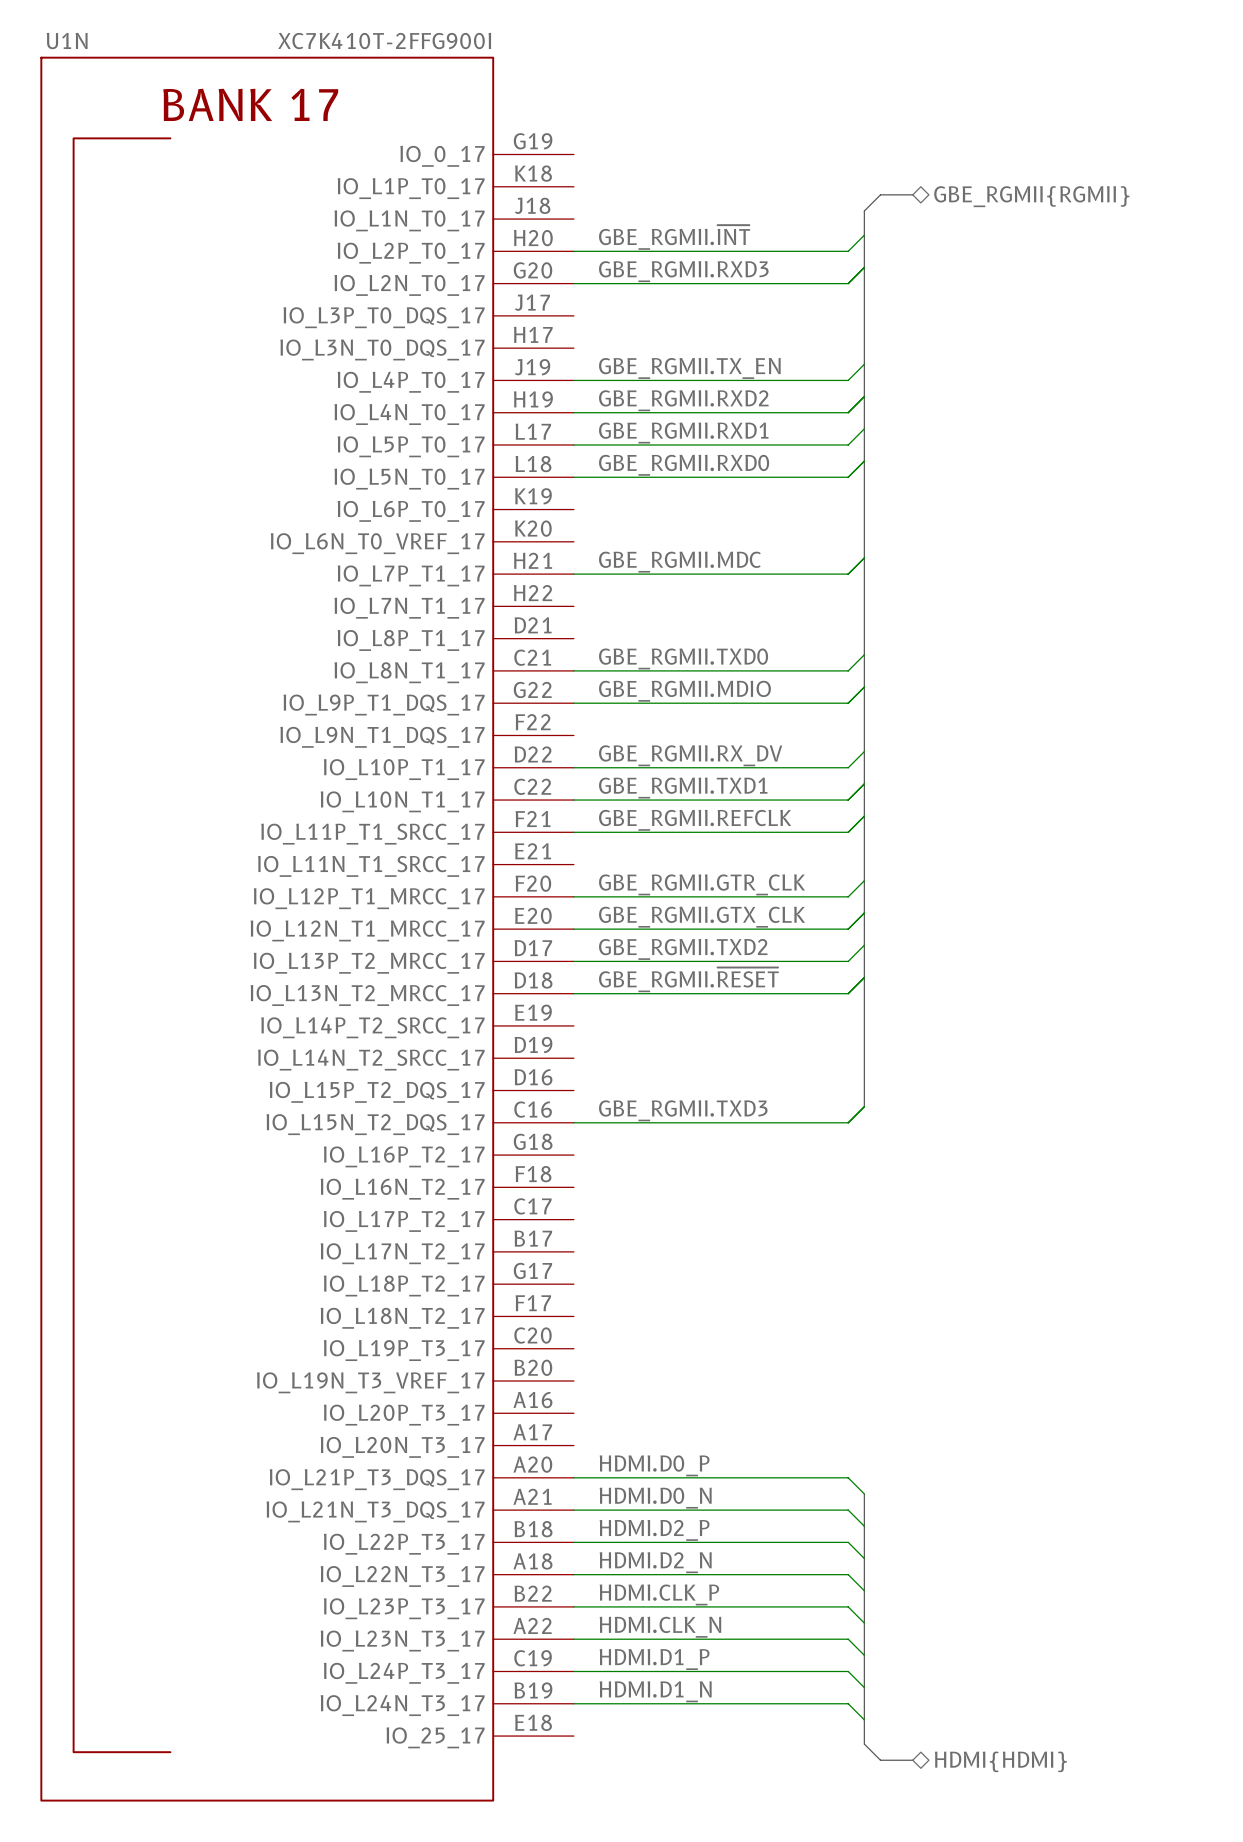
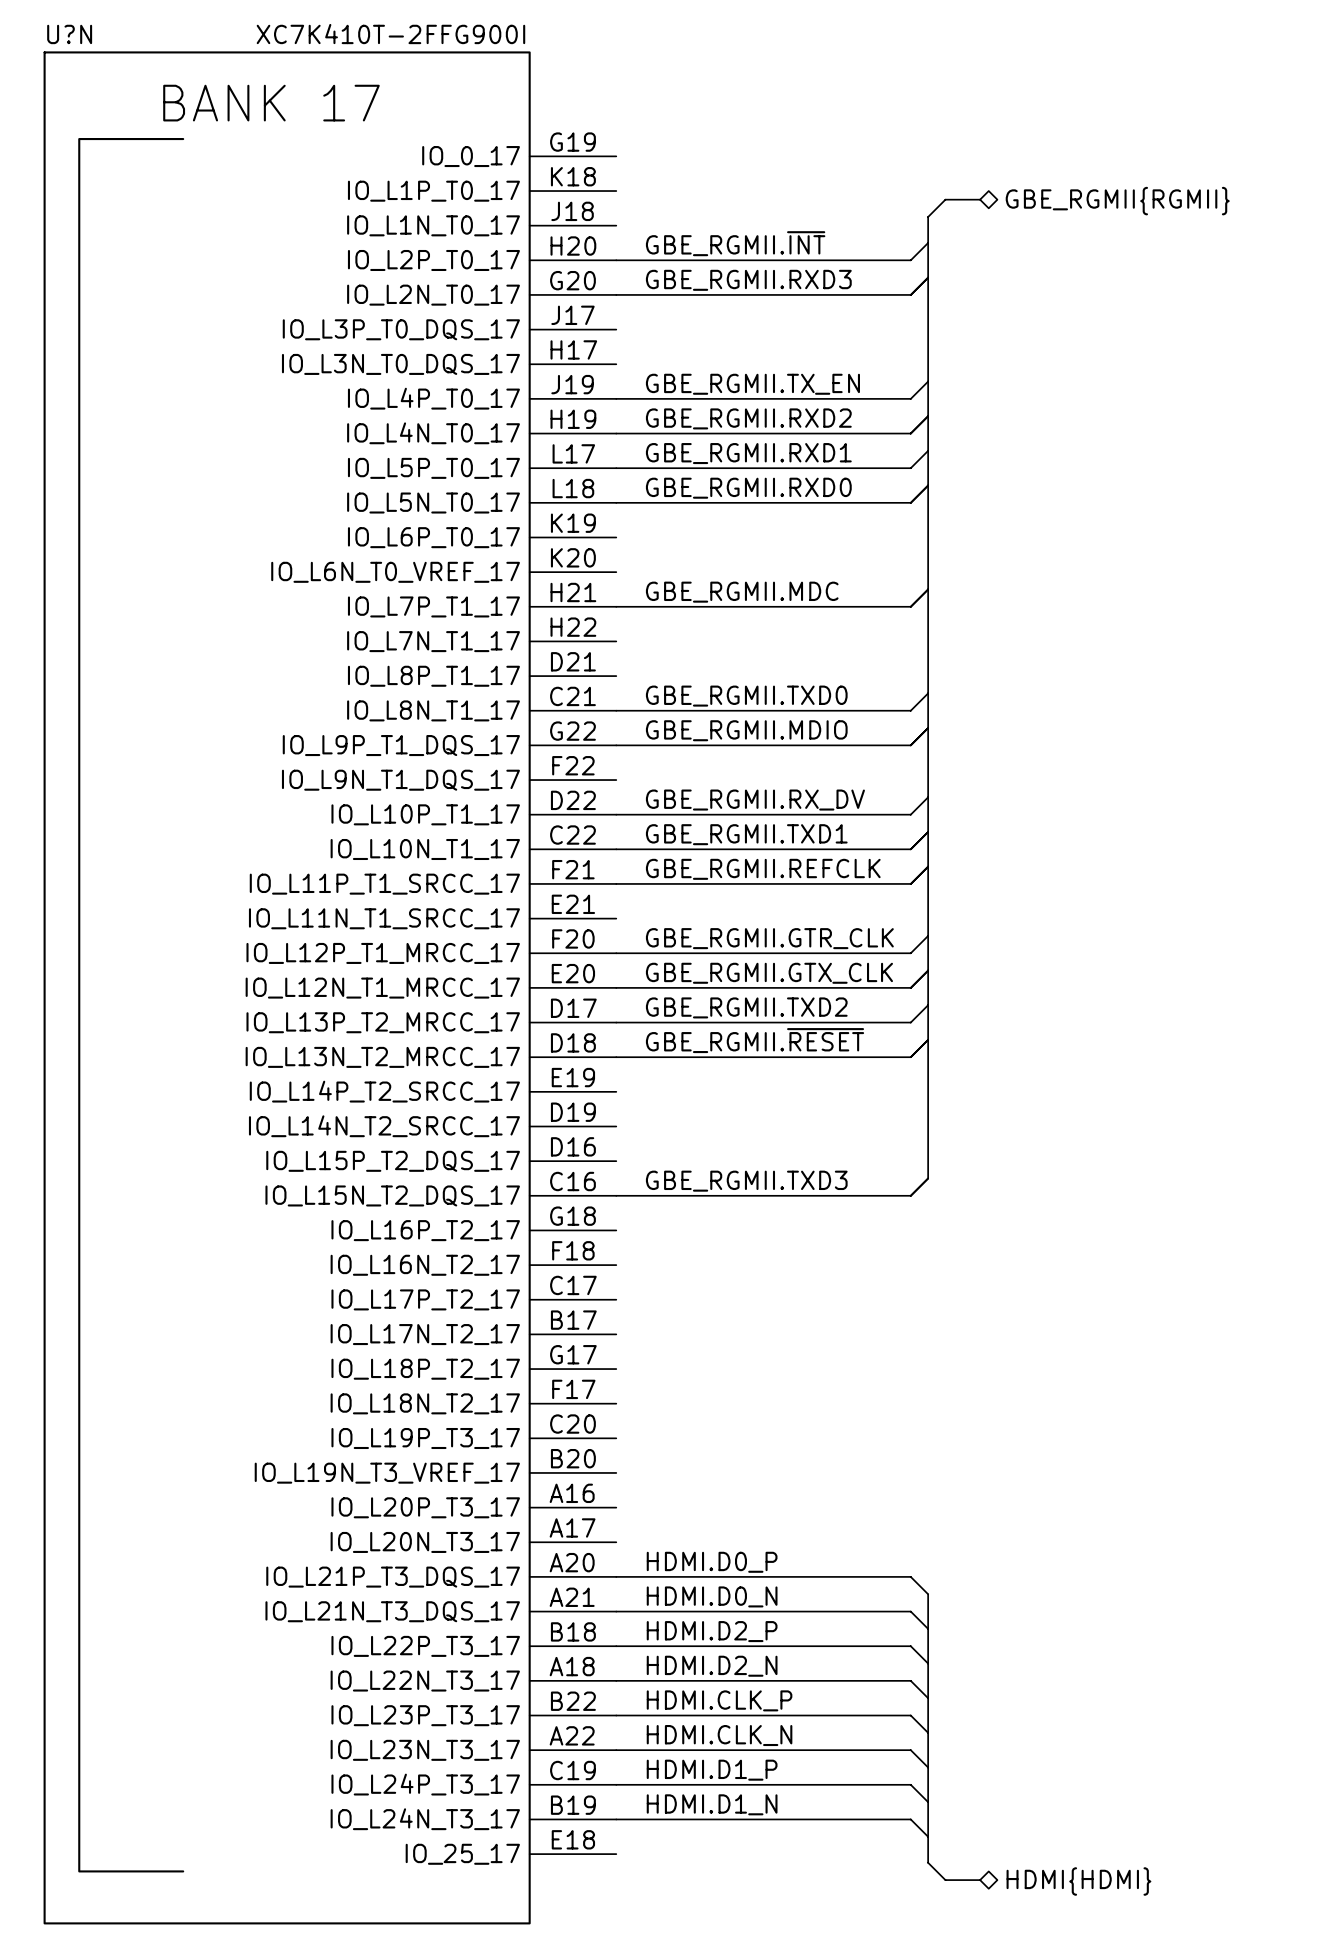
U1N name: U1N (67, 41) -> U?N (69, 34)

